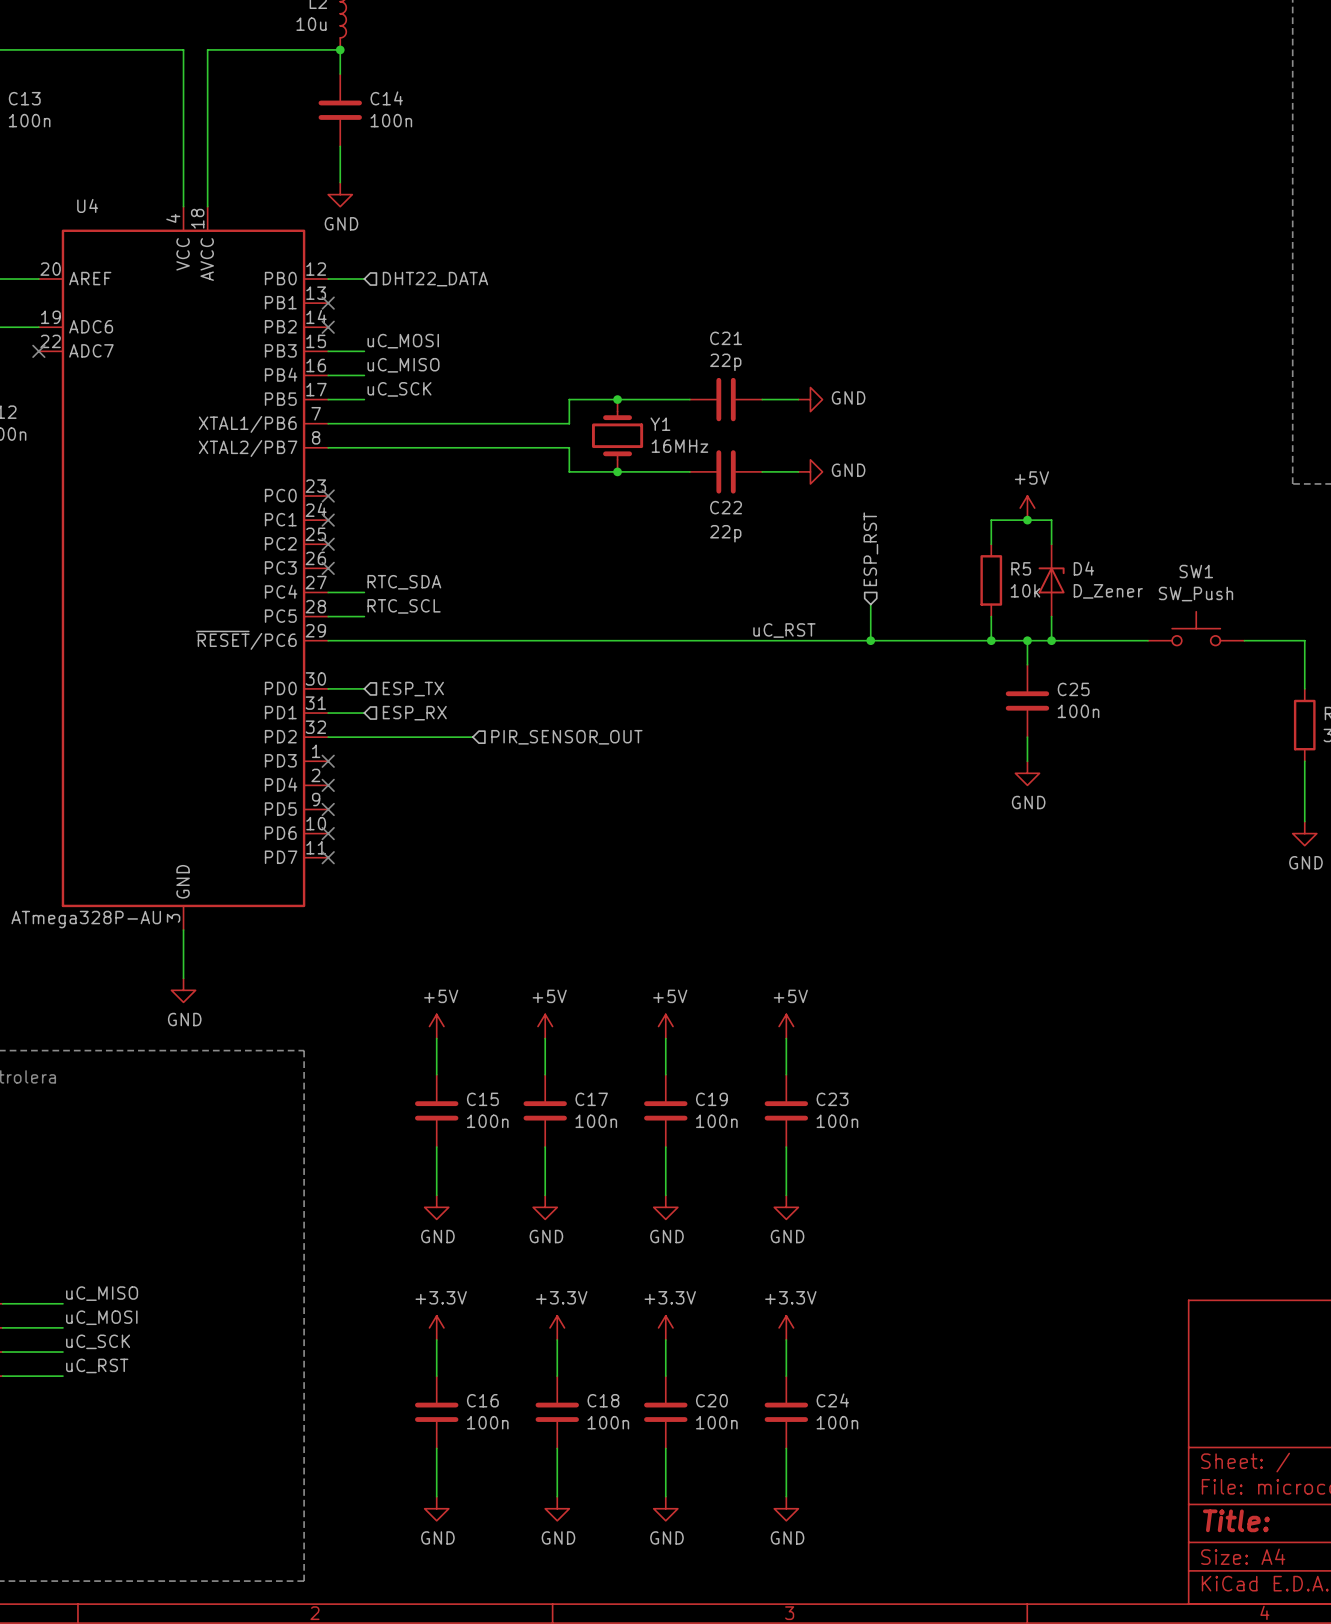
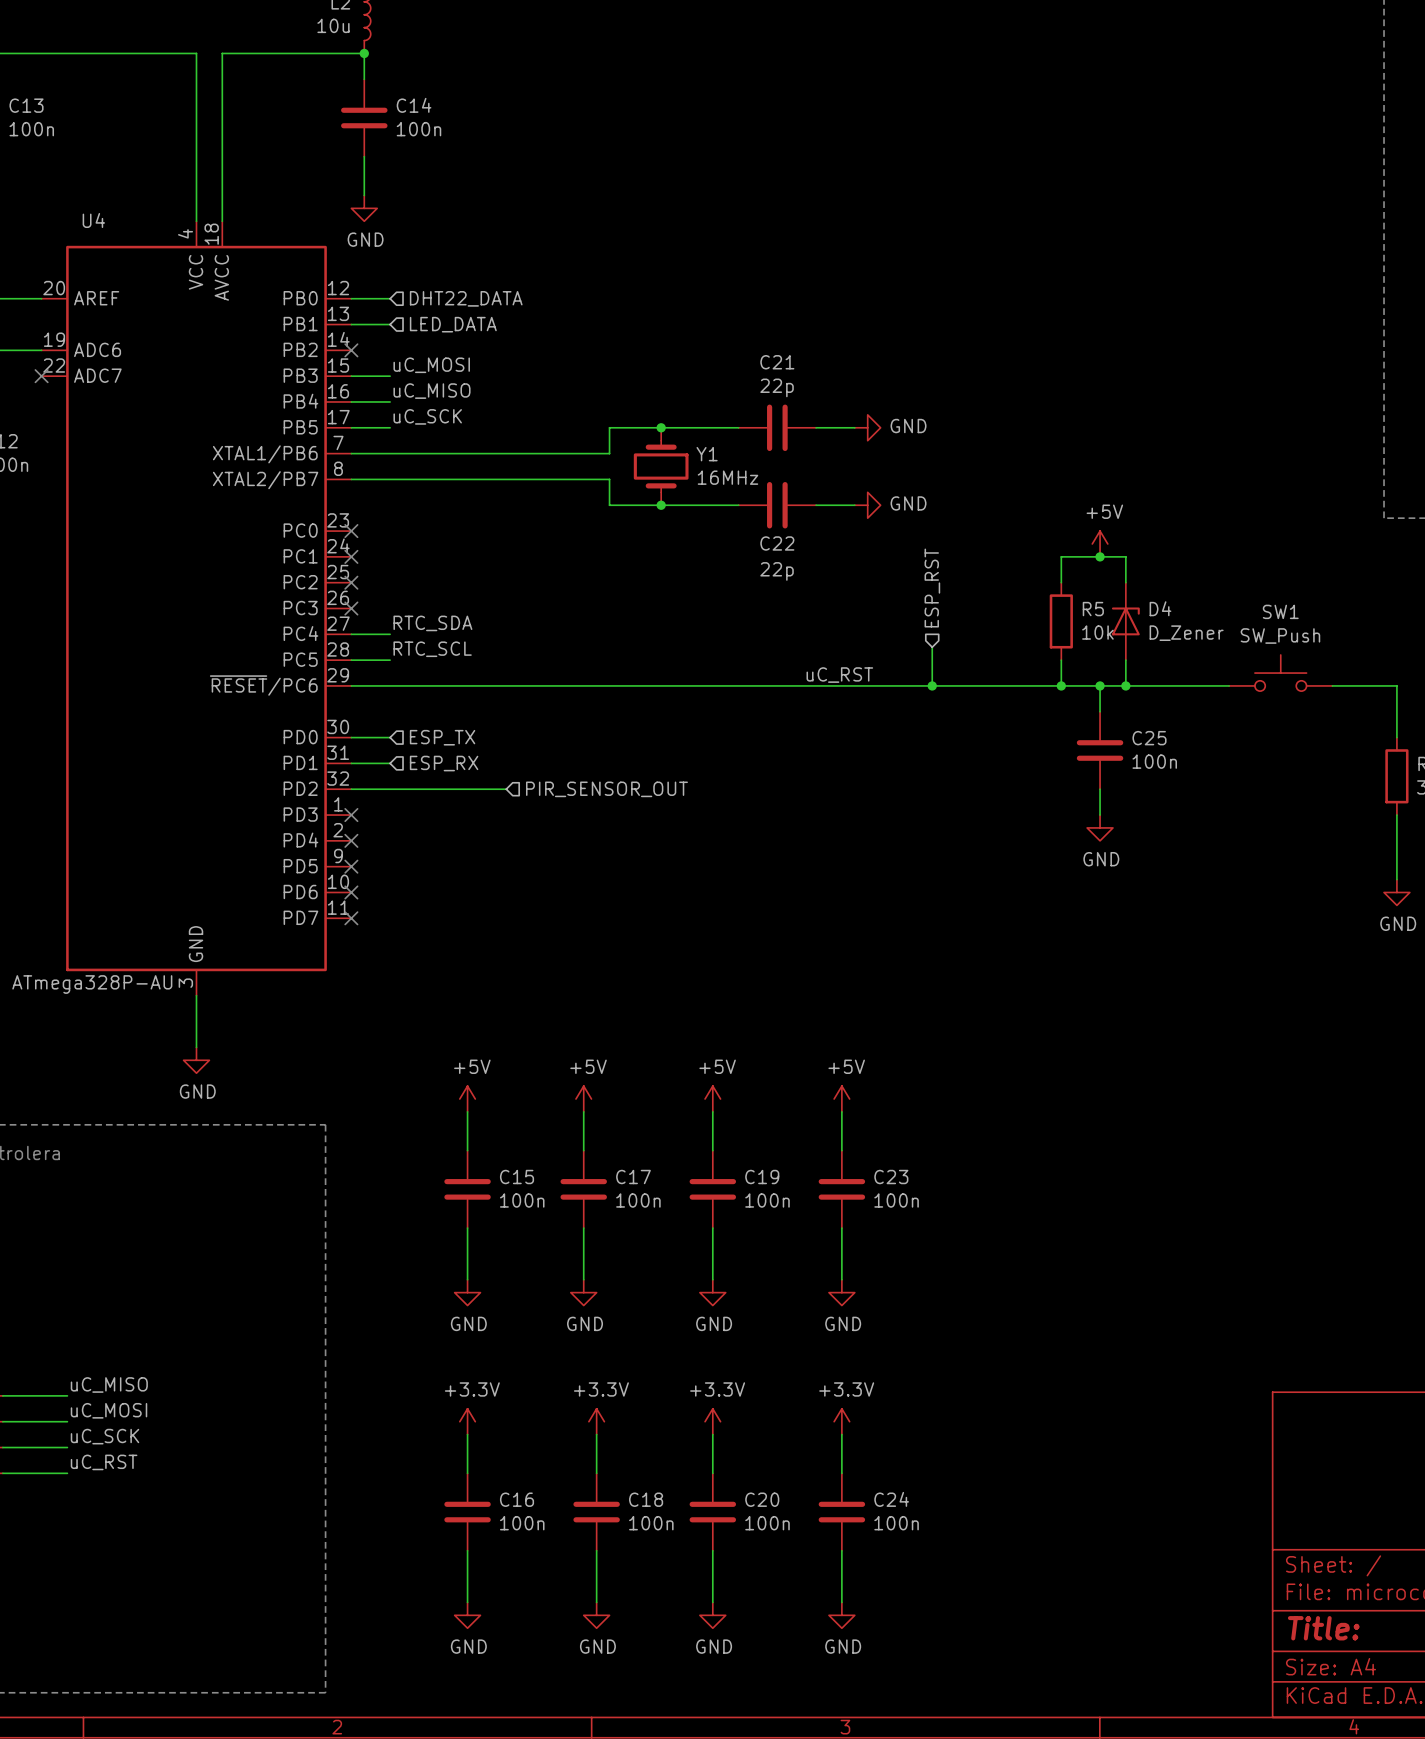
wire: none -> (351, 324) (390, 324)
no-connect mark: (328, 303) -> none
hierarchical label: none -> LED_DATA (453, 324)

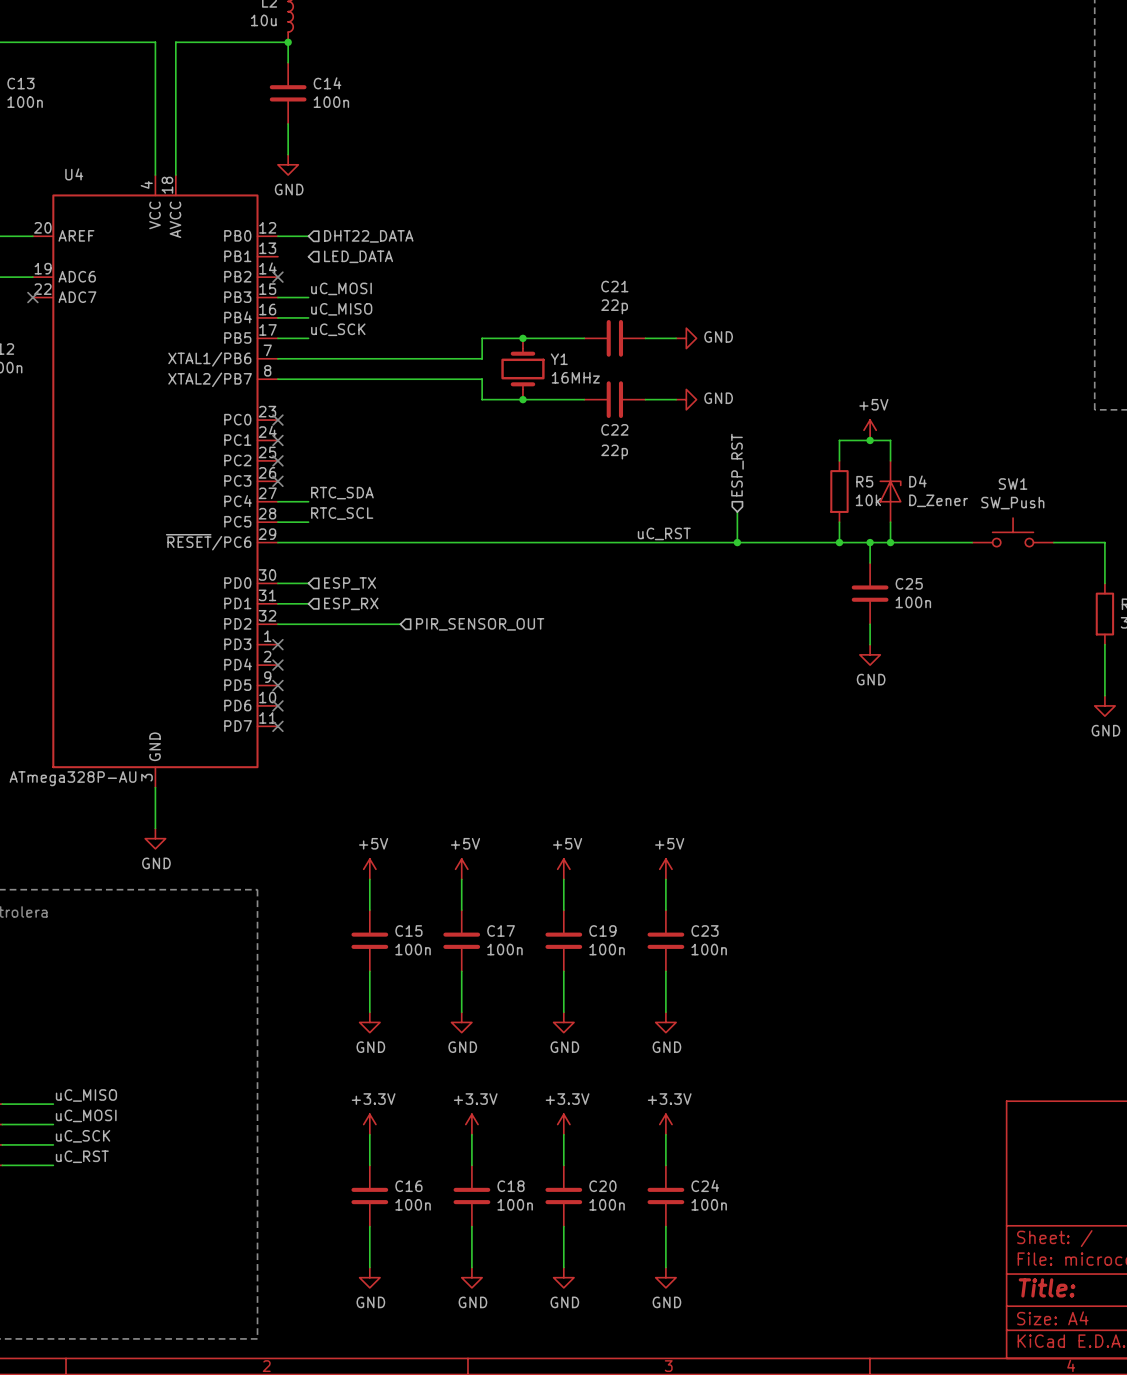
wire: (351, 324) (390, 324) -> none

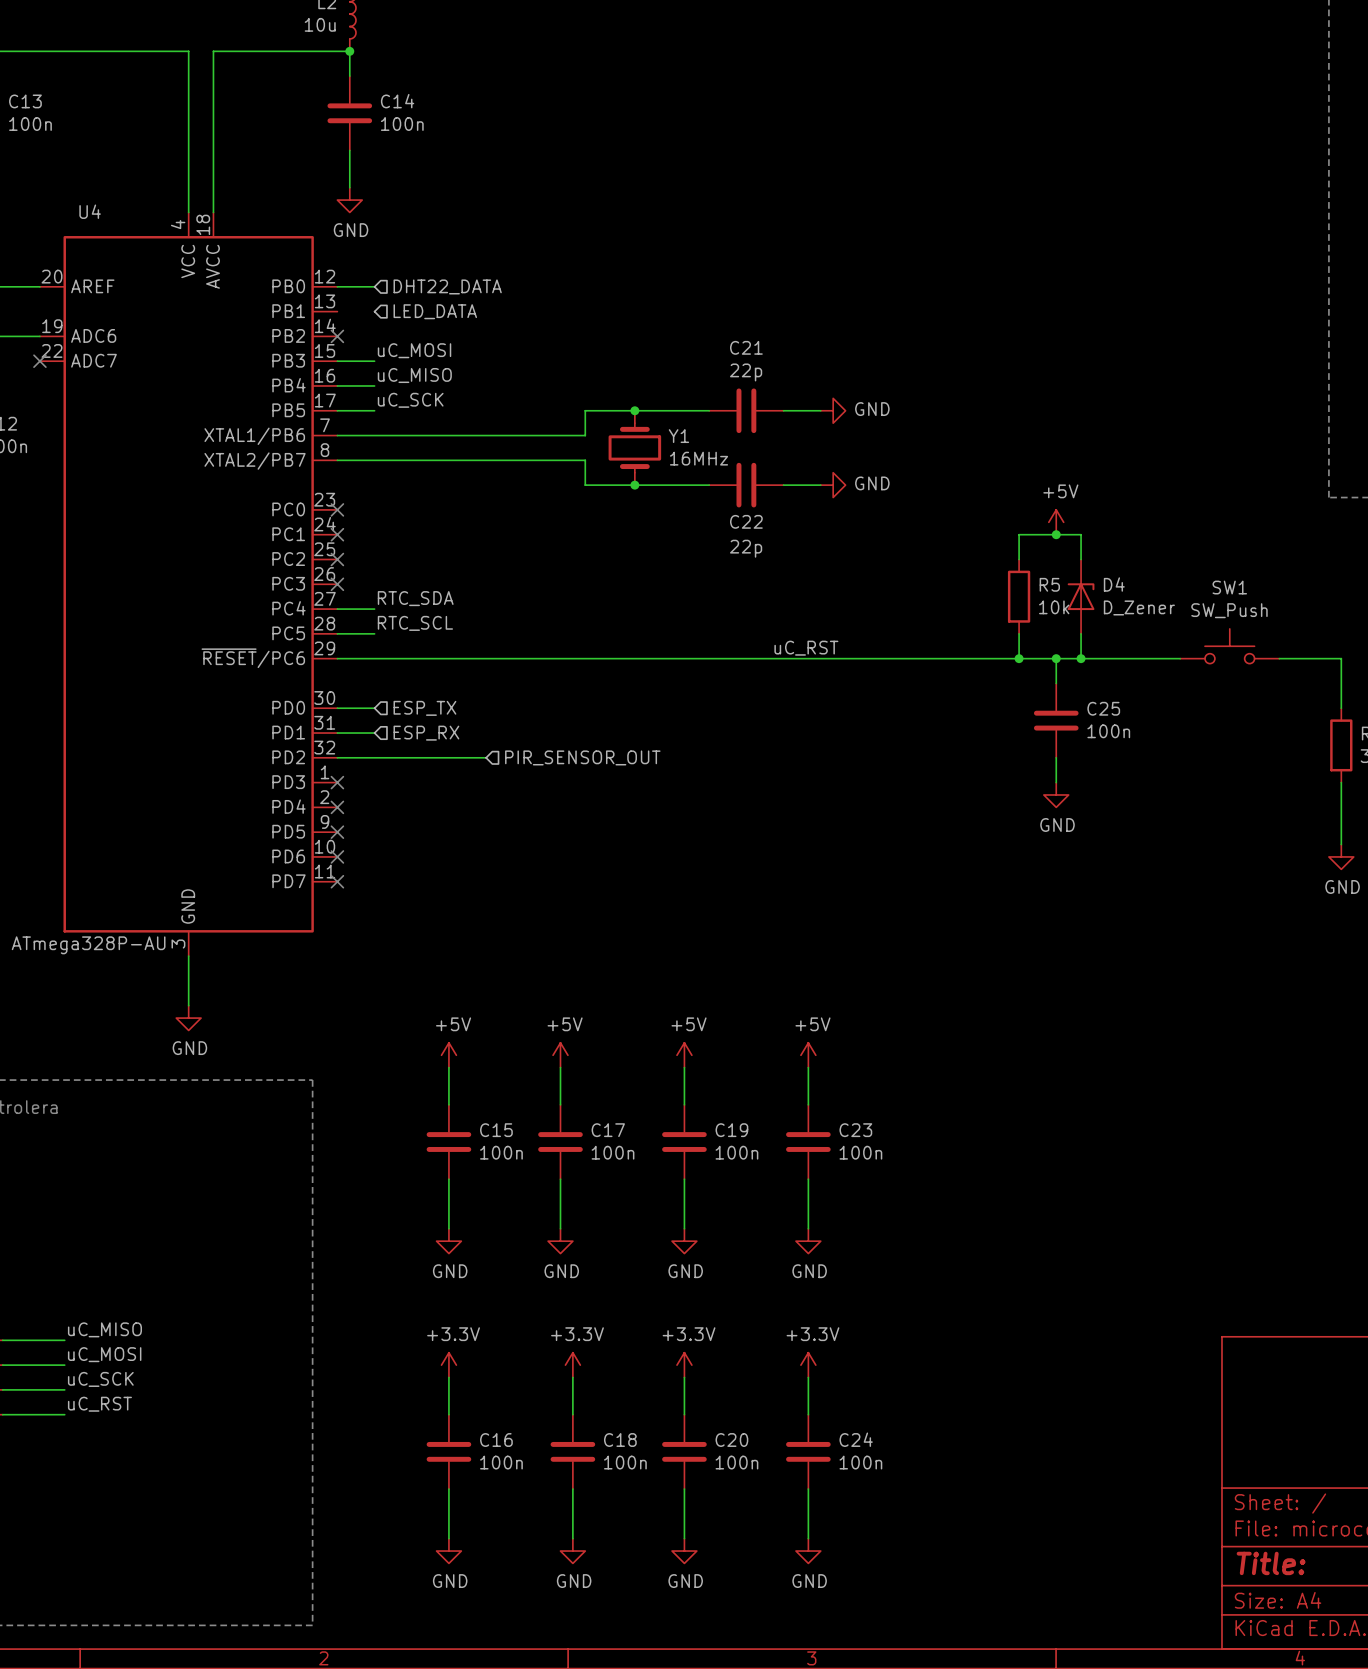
hierarchical label: ESP_RST (737, 465) -> none
wire: (737, 511) (737, 542) -> none
junction: (737, 542) -> none

